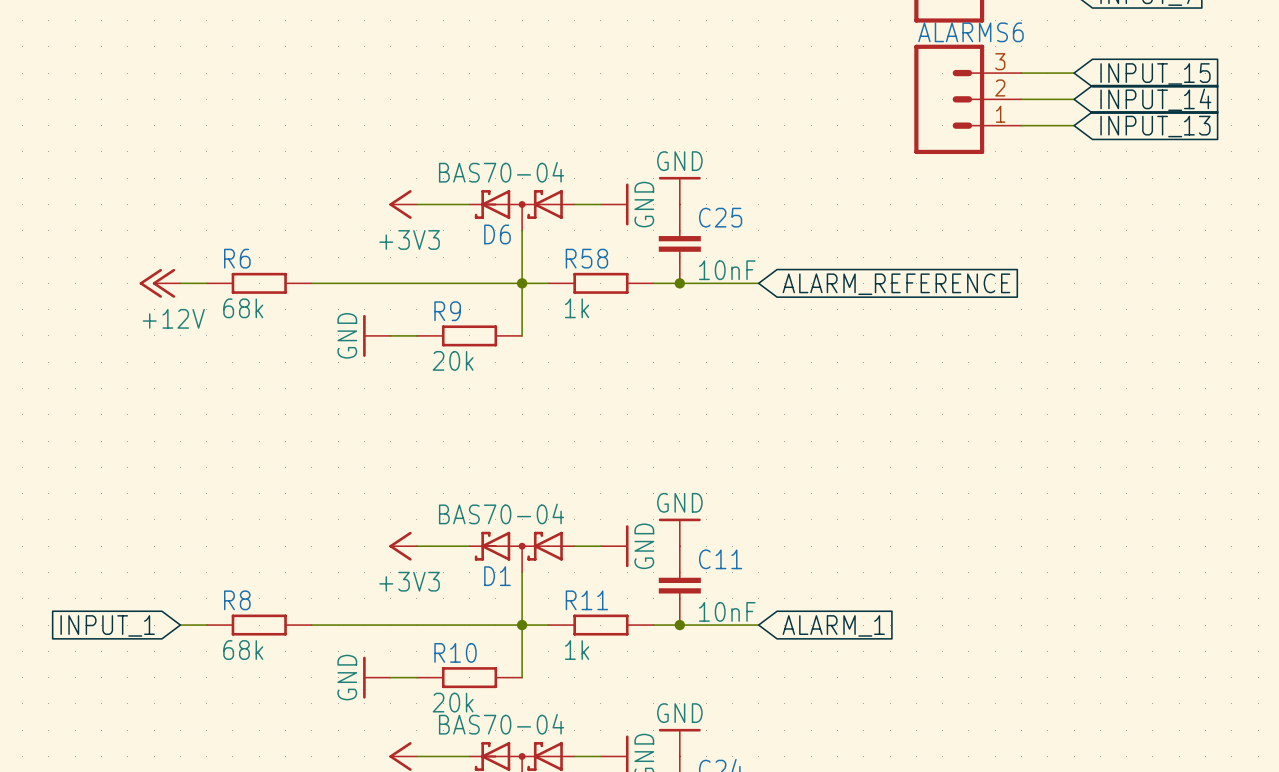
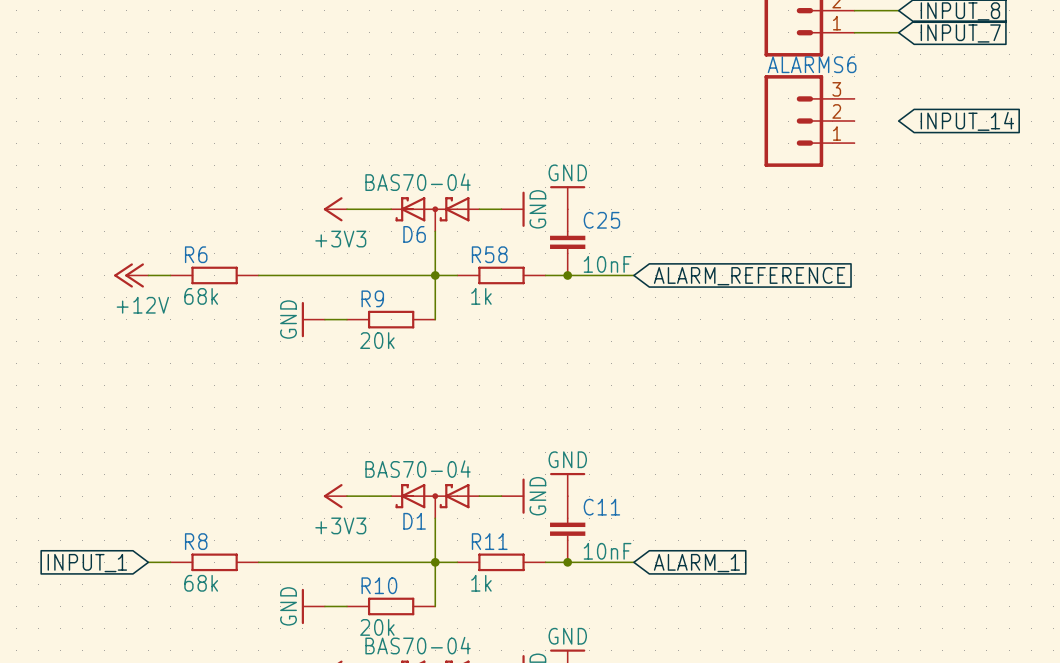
wire: (1021, 73) (1074, 73) -> none
global label: INPUT_15 (1155, 73) -> none
wire: (1021, 99) (1074, 99) -> none
wire: (1021, 125) (1074, 125) -> none
global label: INPUT_13 (1155, 126) -> none

